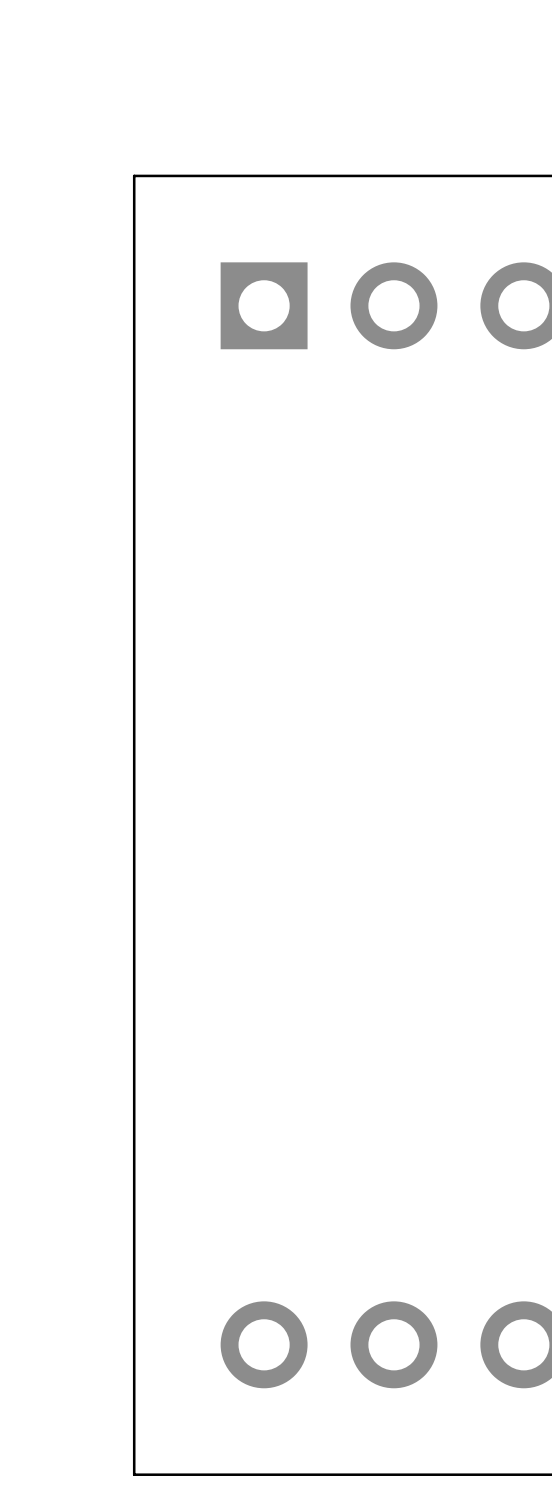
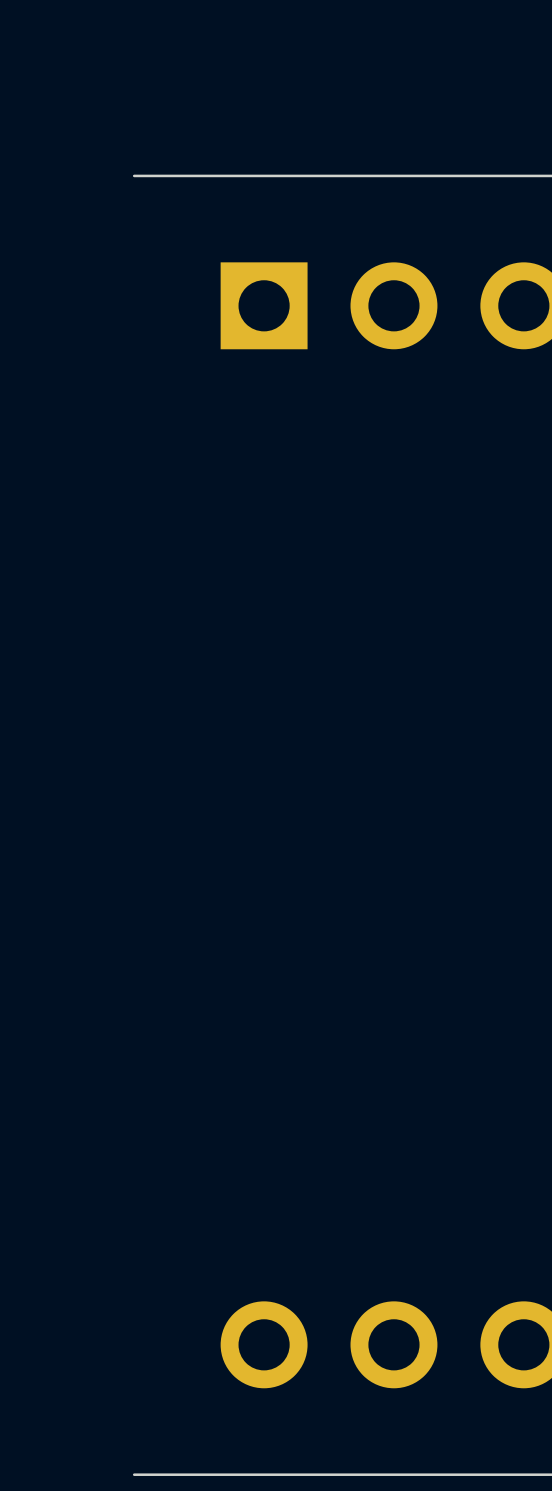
board edge: (134, 175) (134, 1474) -> none

